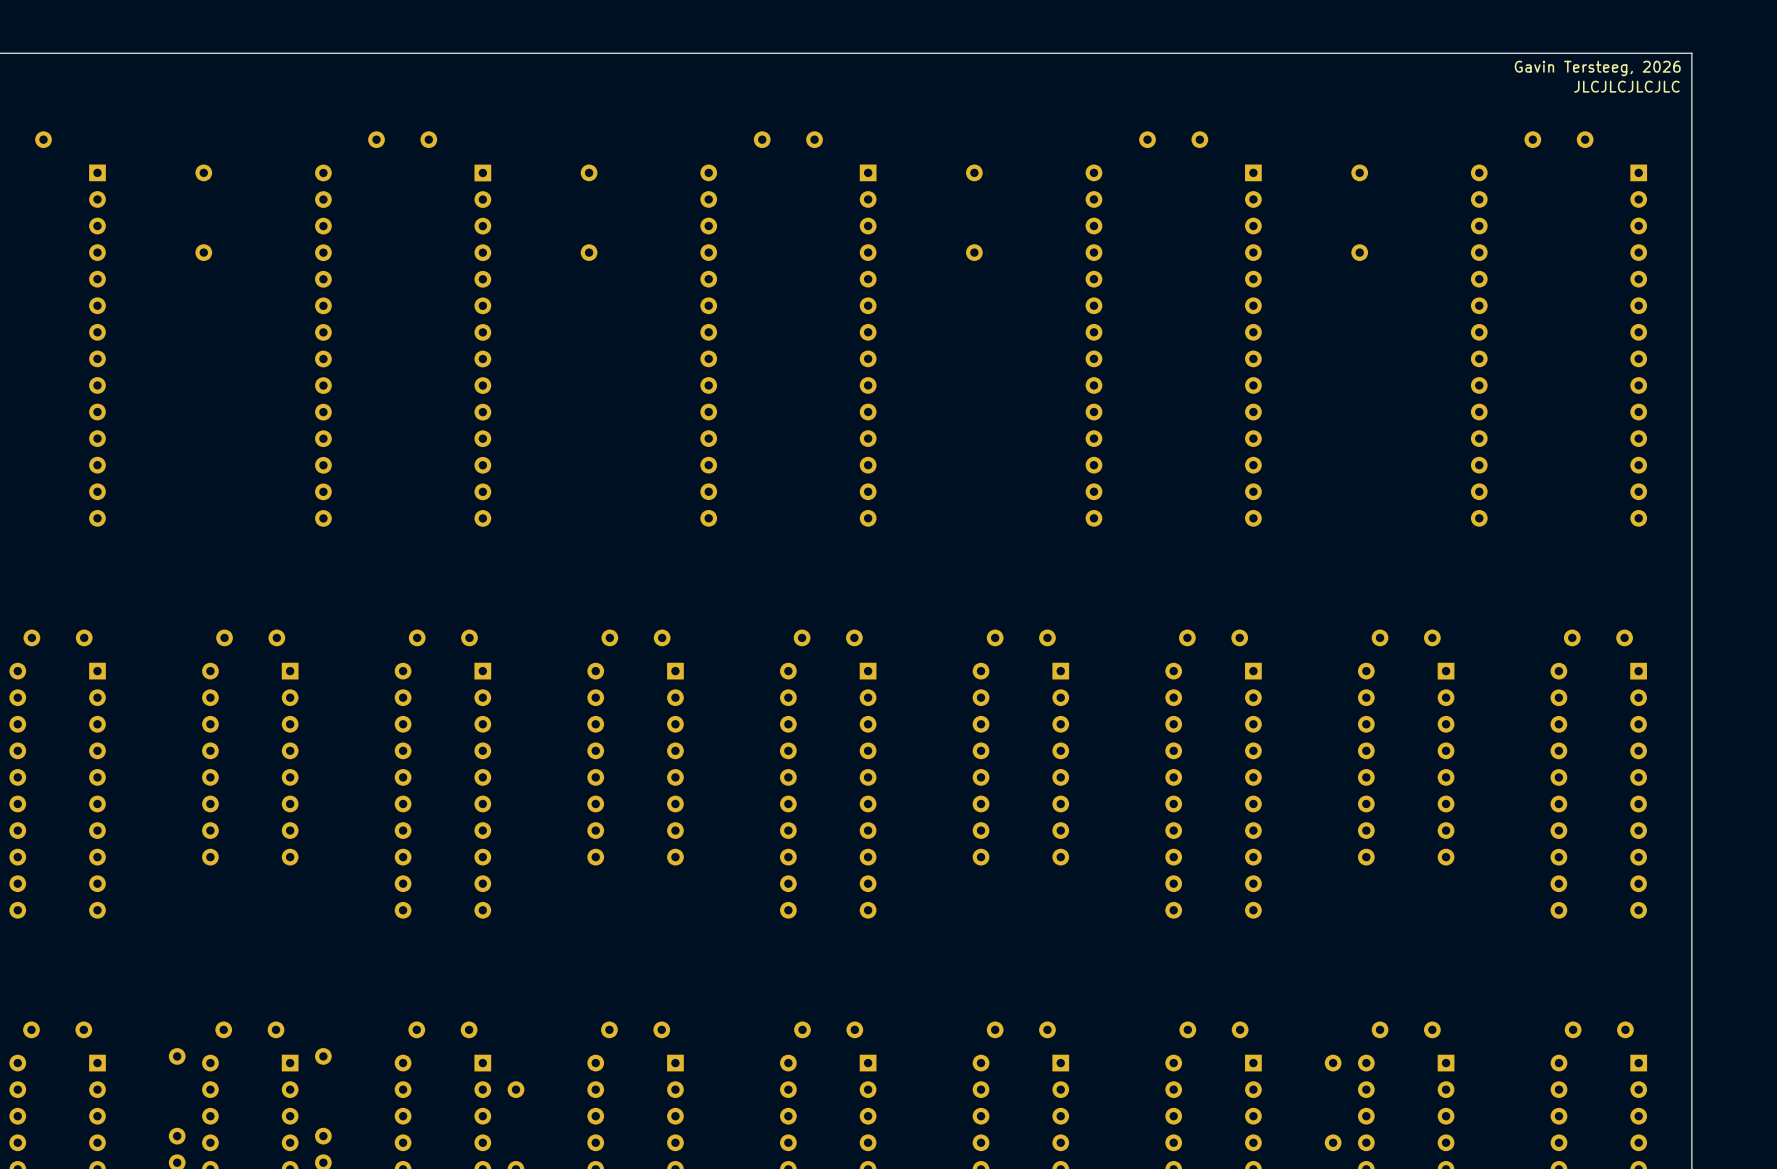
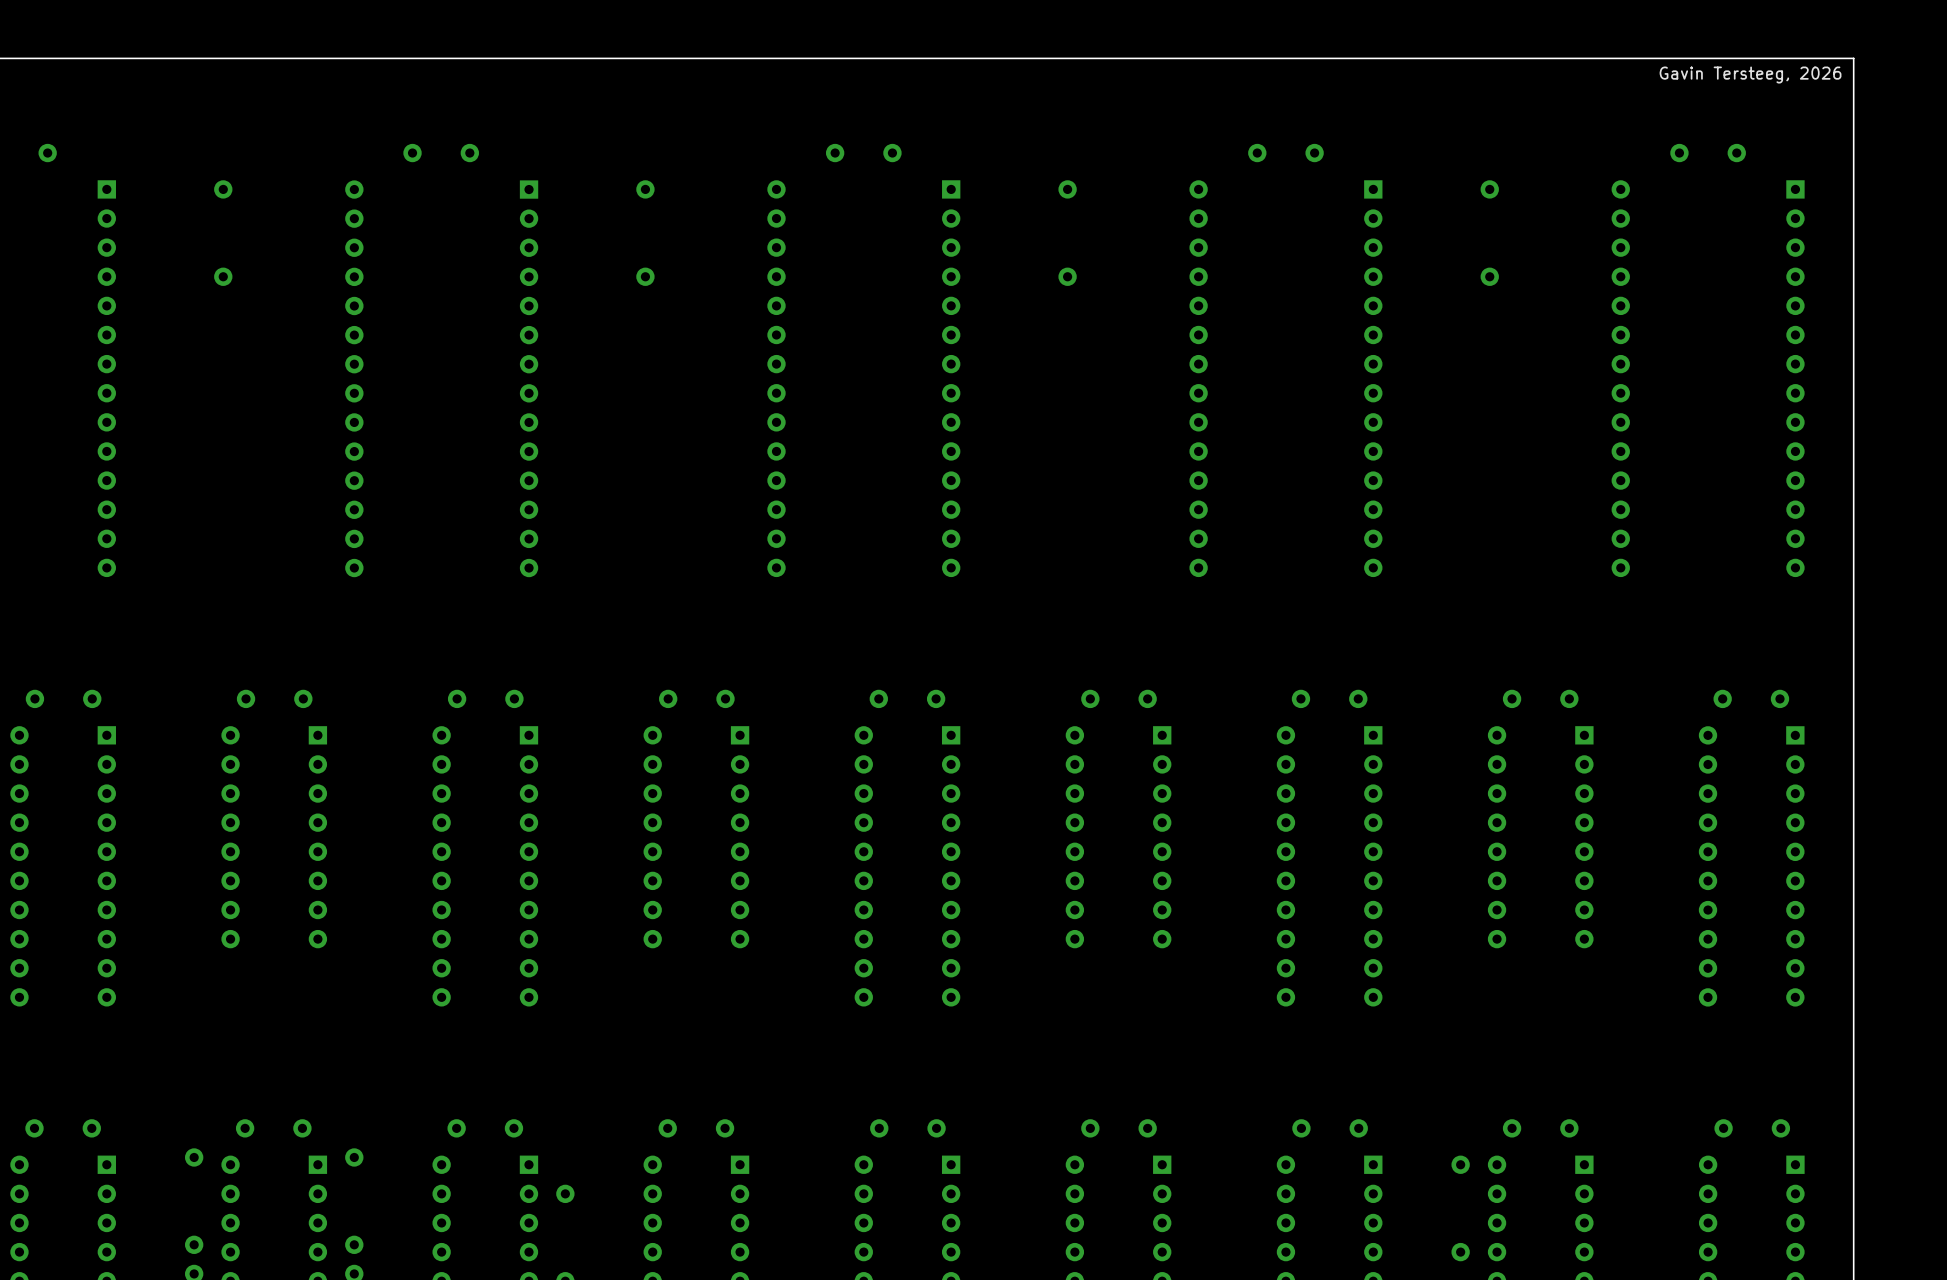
text: JLCJLCJLCJLC (1626, 86) -> none

